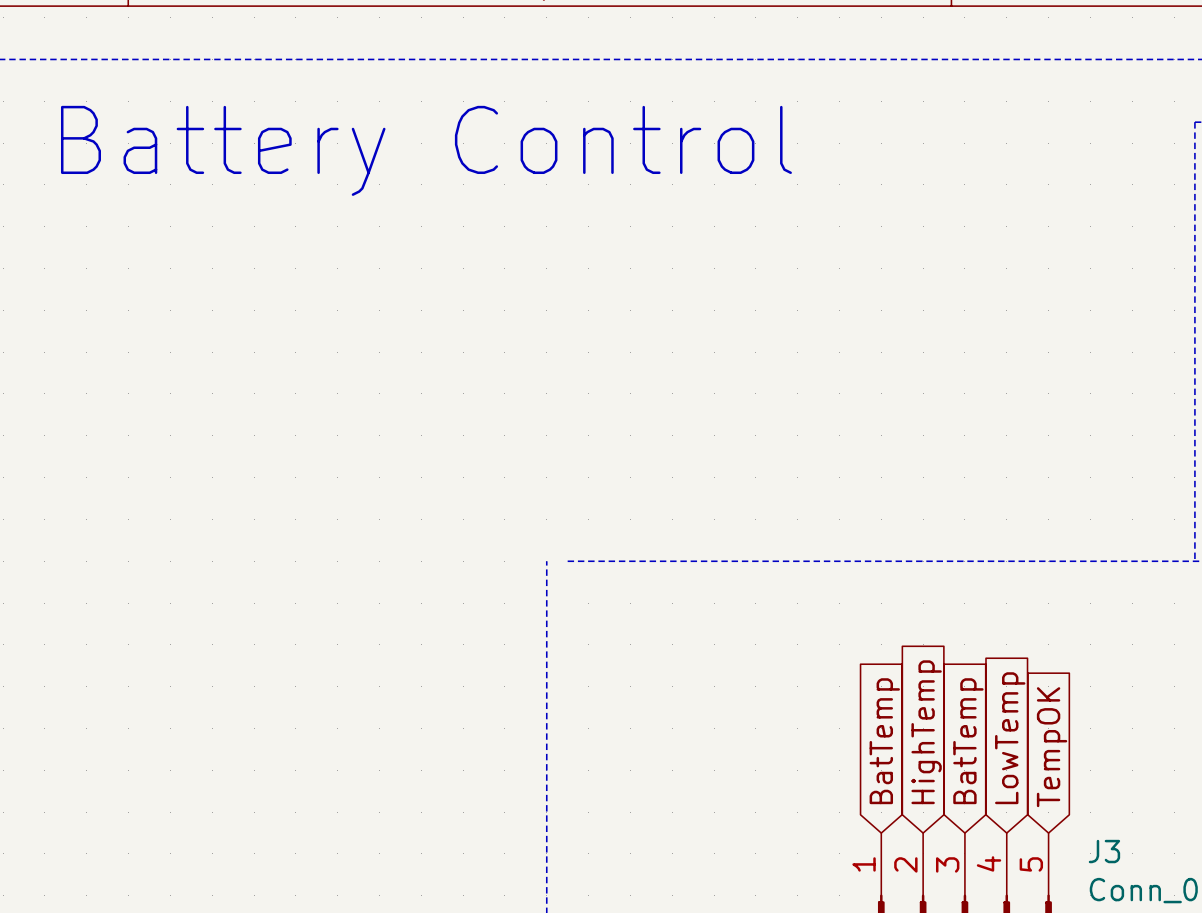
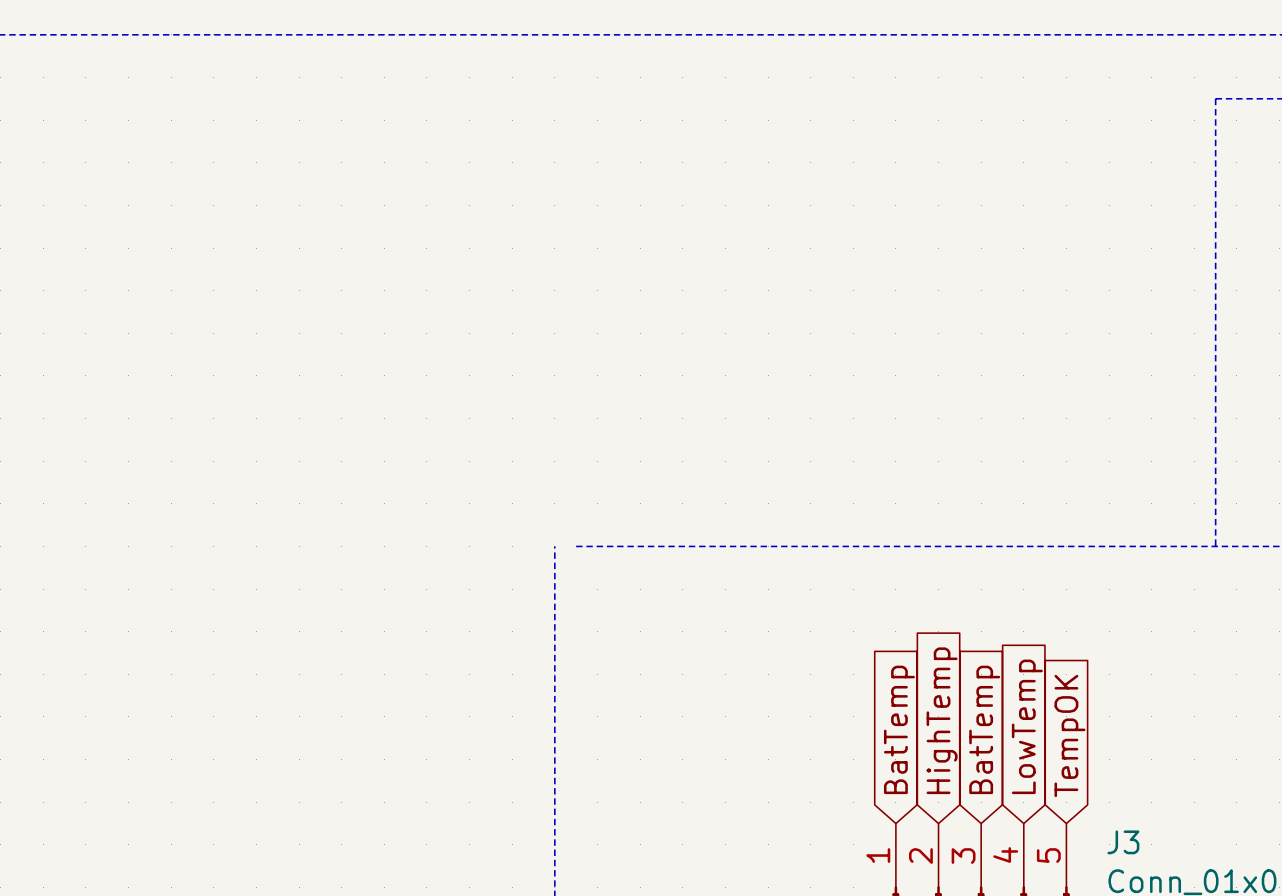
text: Battery Control (426, 150) -> none

